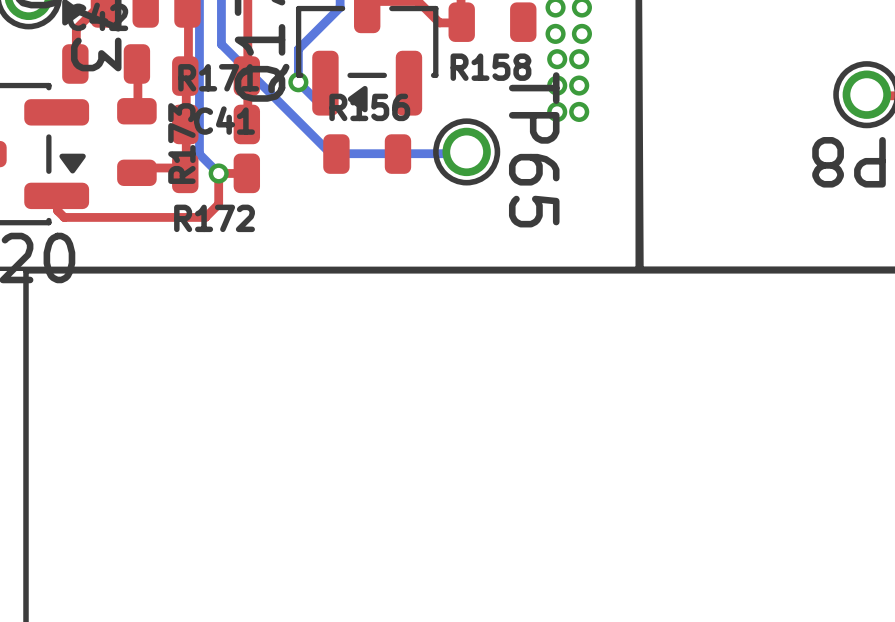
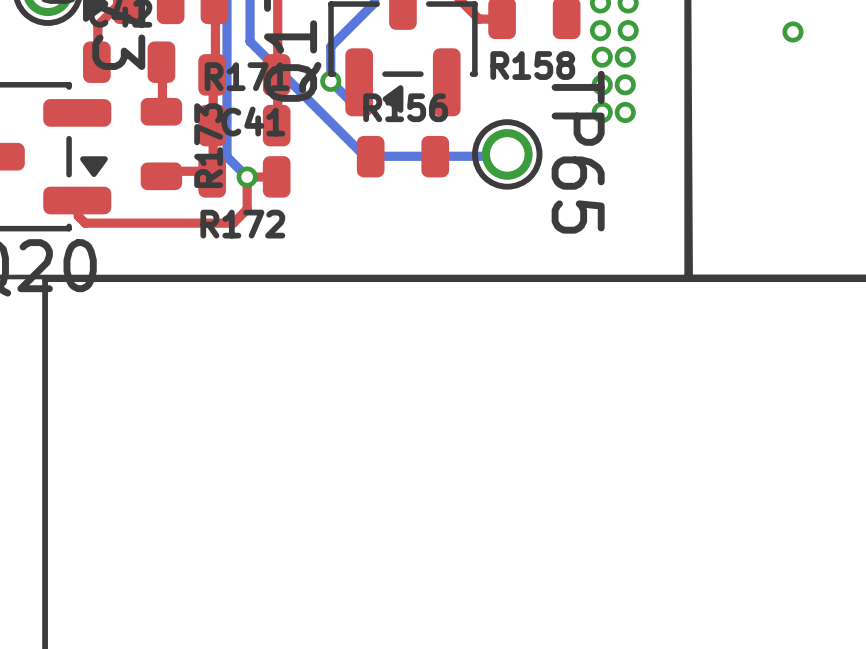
via: none -> (792, 31)

